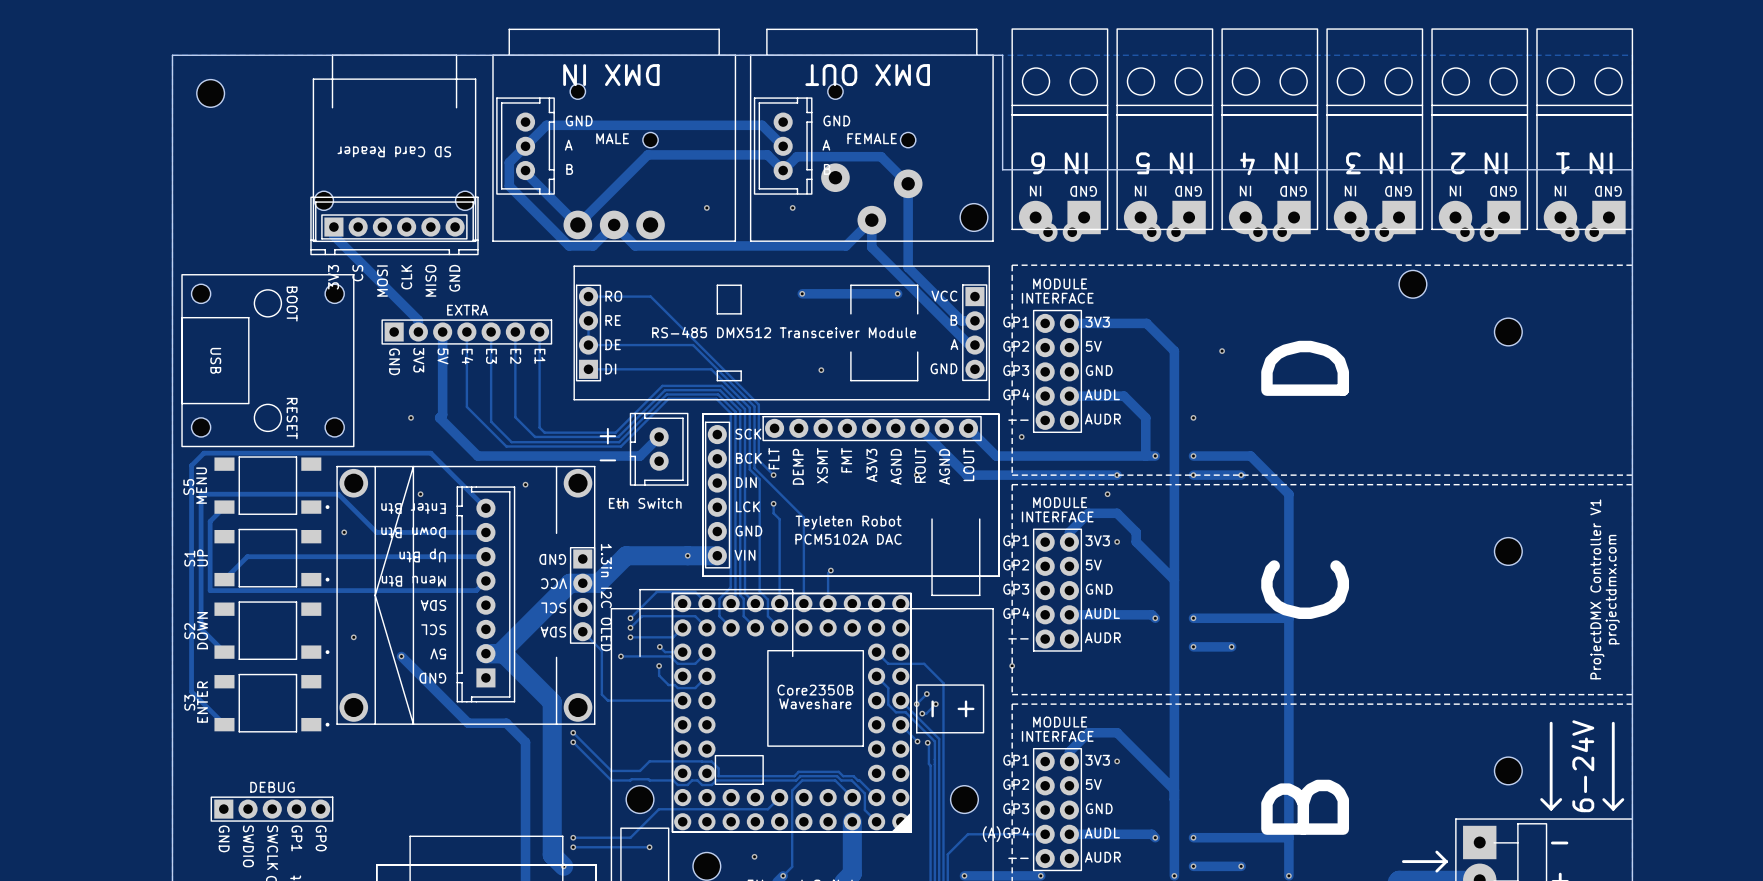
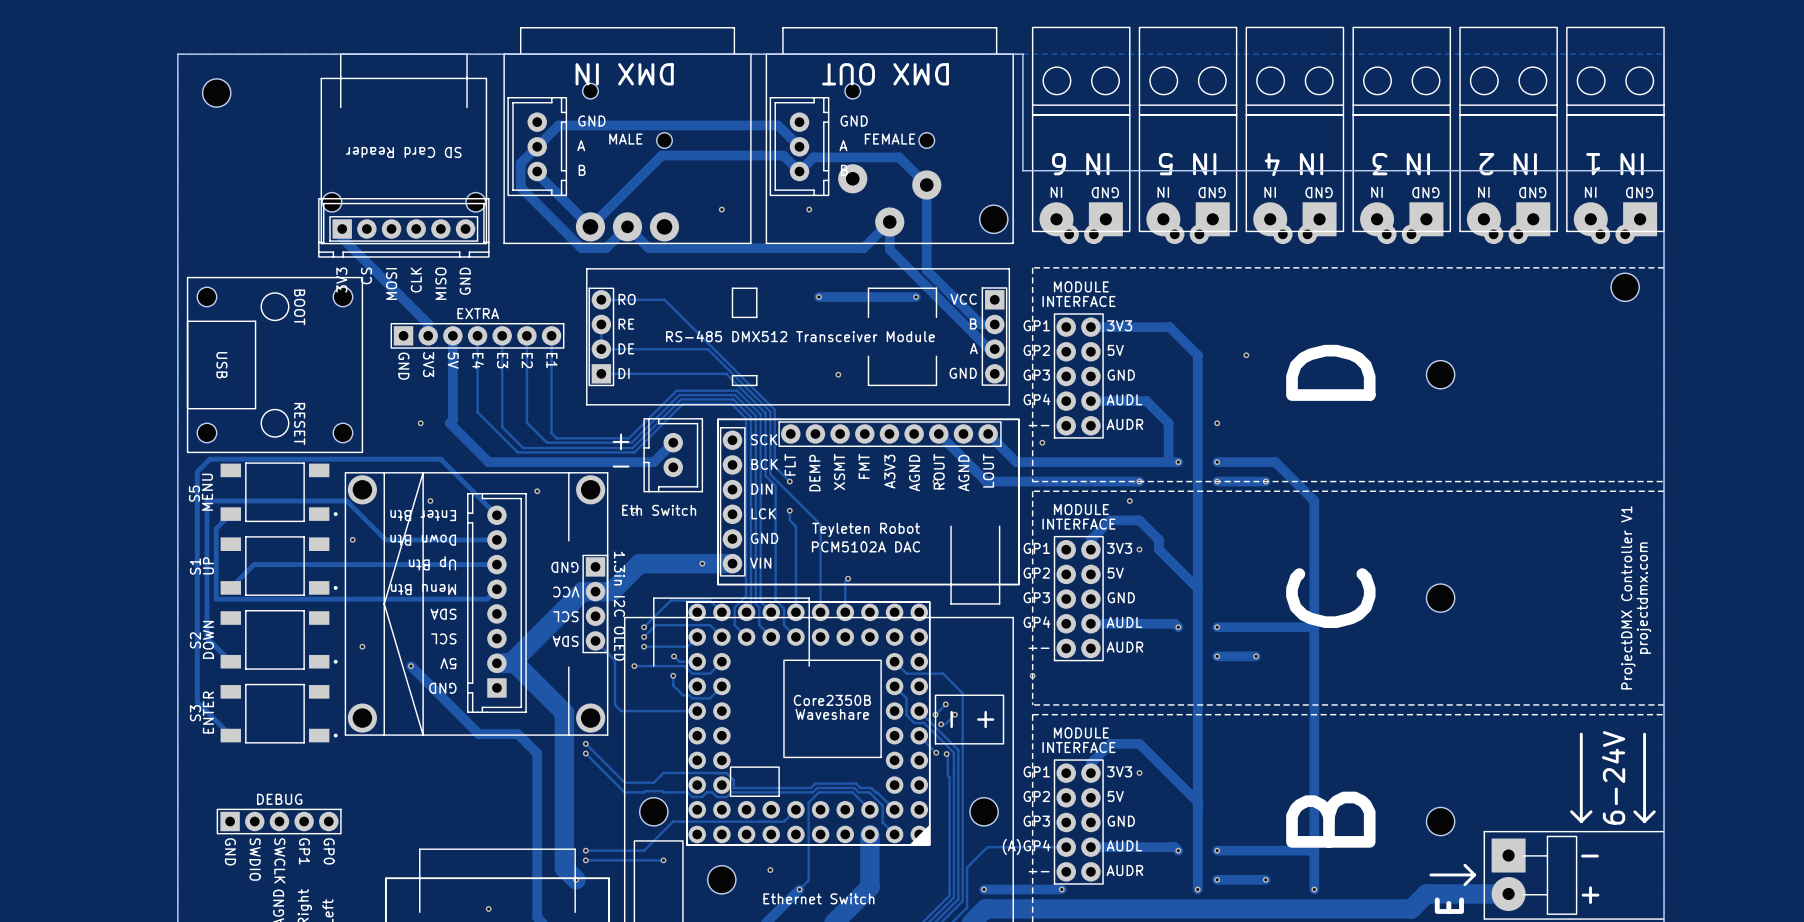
part: (1412, 284) -> none
part: none -> (1625, 287)
part: (1508, 332) -> none
part: none -> (1440, 374)
part: (1508, 551) -> none
part: none -> (1440, 598)
part: (1508, 770) -> none
part: none -> (1440, 821)

